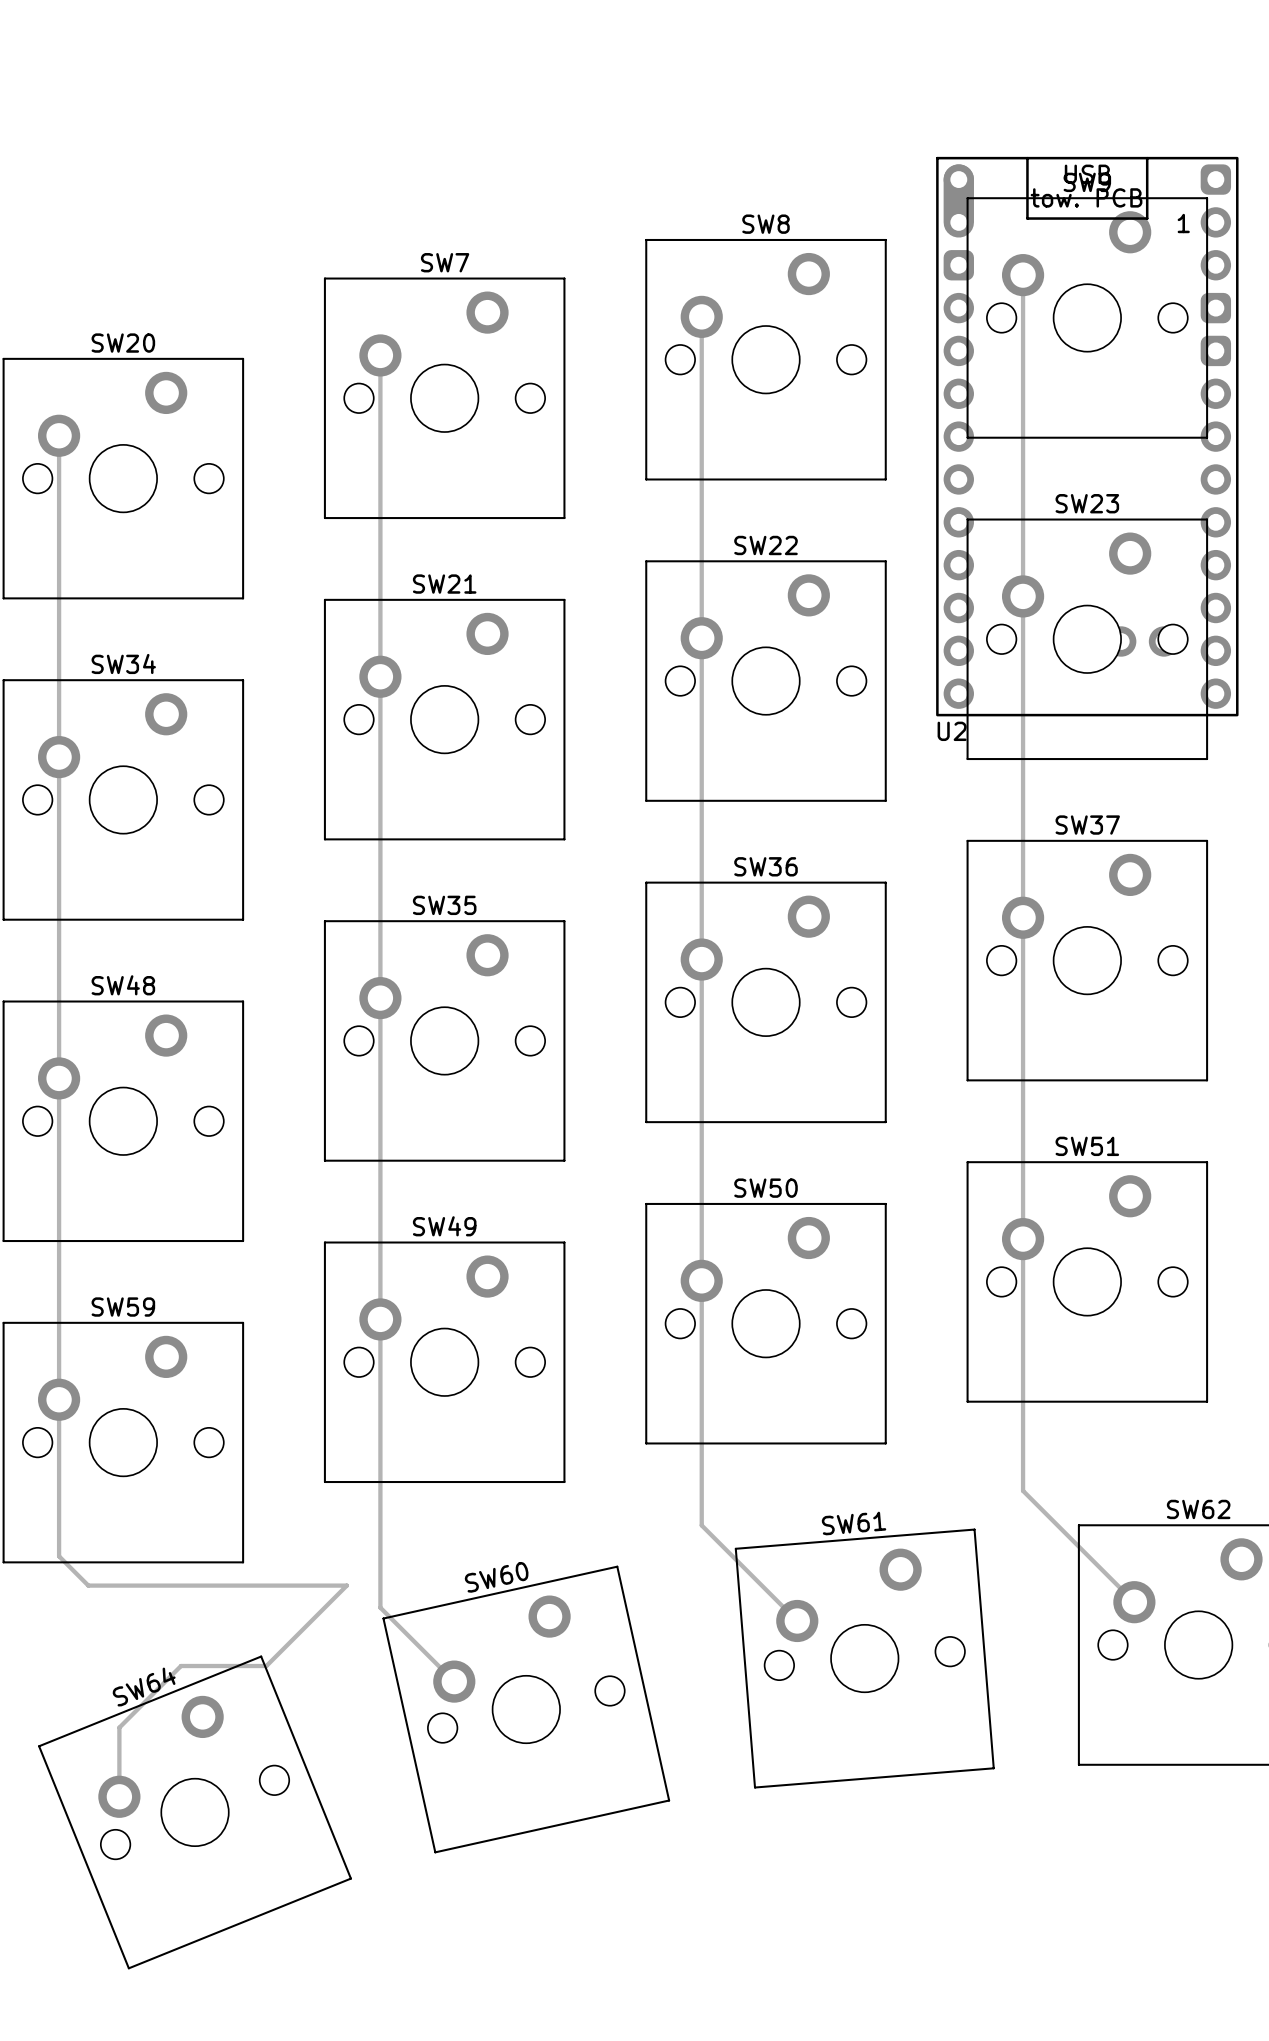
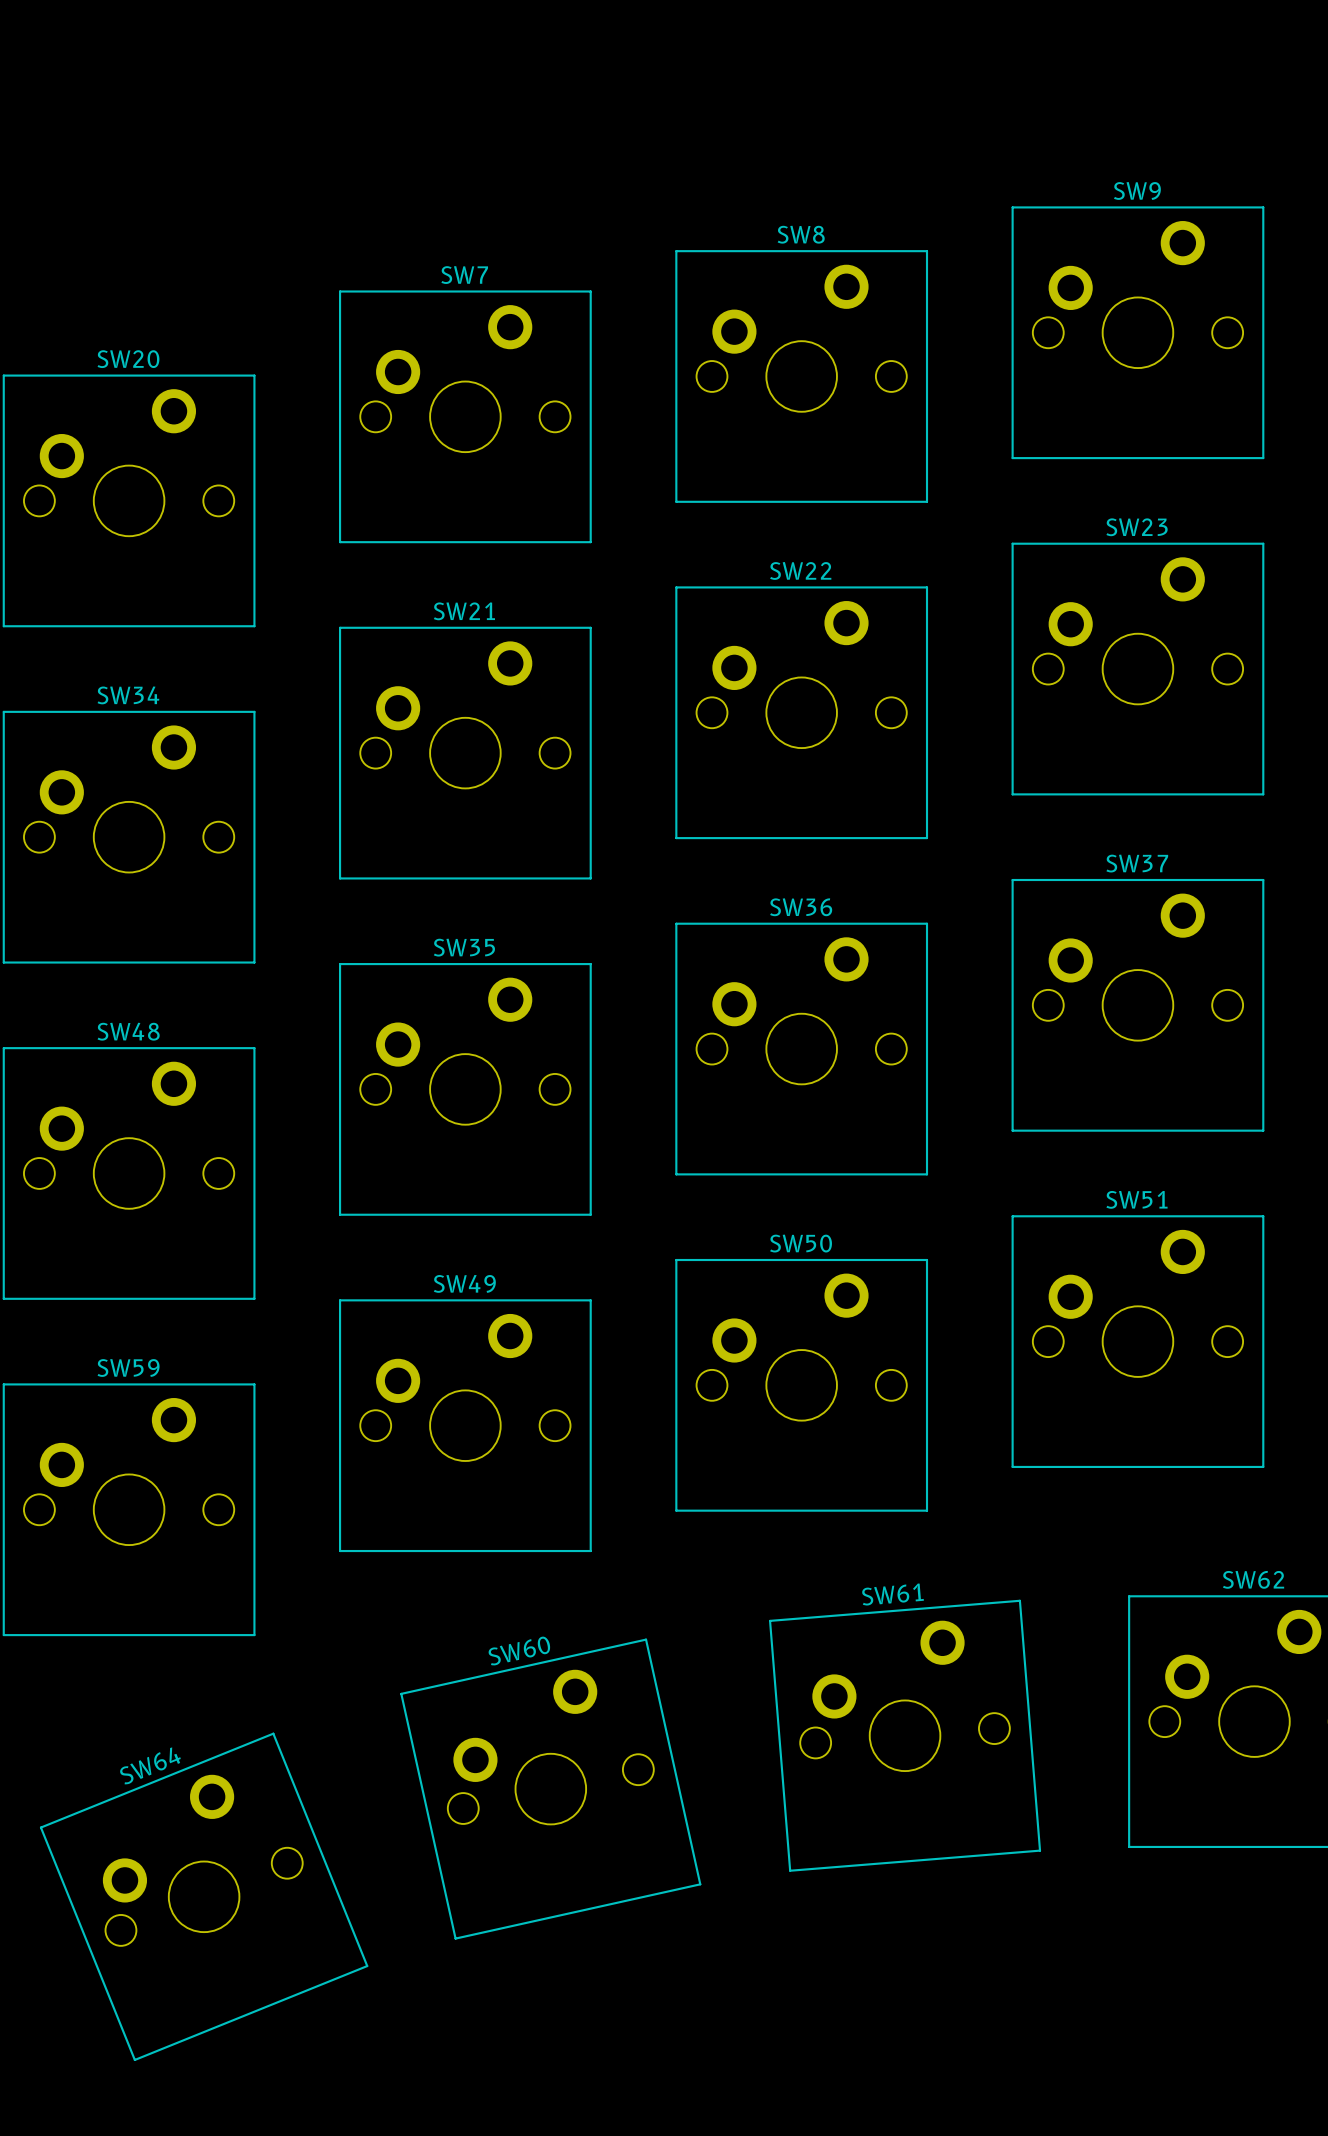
track: (1023, 275) (1023, 1490) (1134, 1602) -> none
track: (701, 316) (701, 1525) (797, 1620) -> none
track: (380, 355) (380, 1607) (454, 1681) -> none
track: (59, 435) (59, 1556) (88, 1585) (346, 1585) (266, 1666) (181, 1666) (119, 1727) (119, 1796) -> none
U2: (1087, 436) -> none

